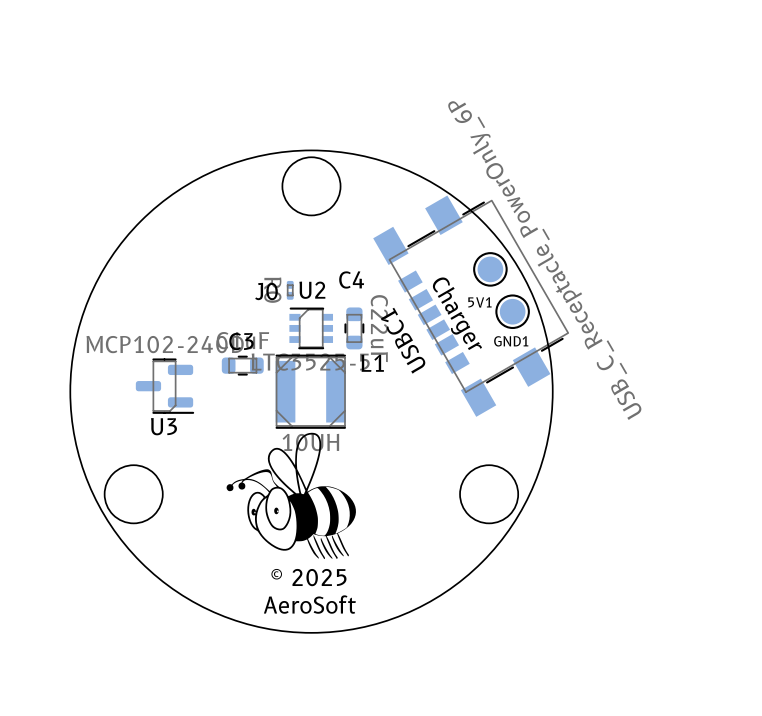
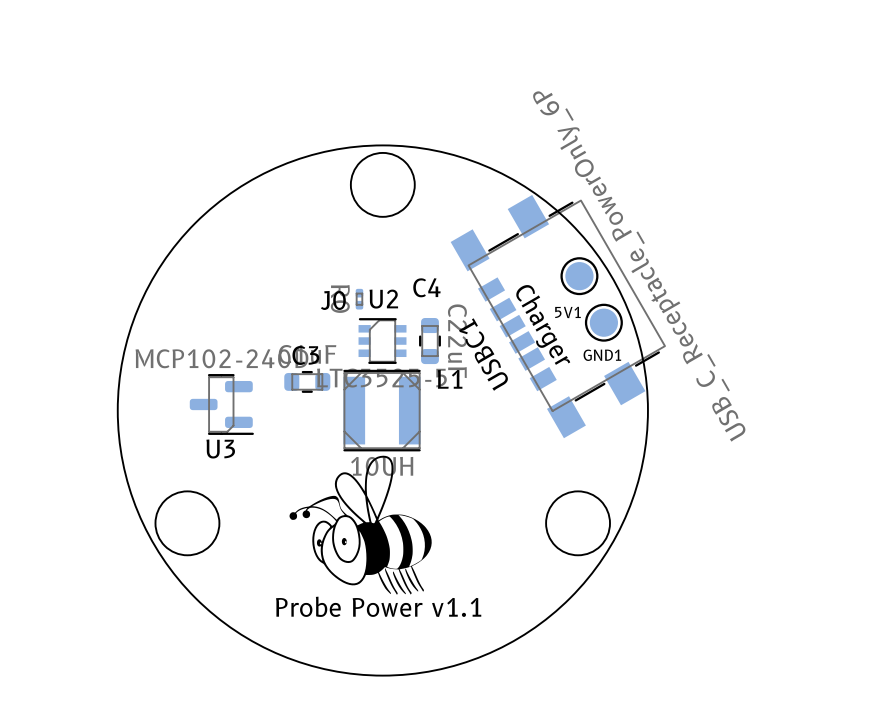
drawing shape: [226, 432, 356, 560] -> [275, 455, 482, 617]
text: © 2025 (308, 577) -> none
text: AeroSoft (309, 604) -> none

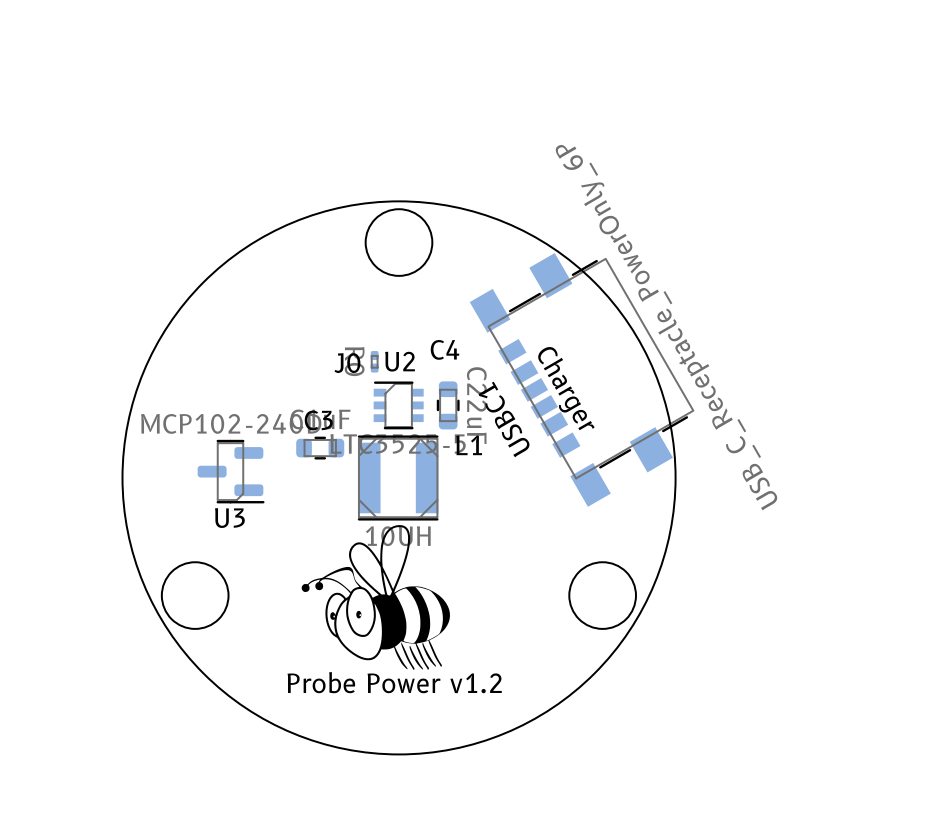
5V1: (579, 276) -> none
GND1: (603, 322) -> none
drawing shape: [275, 455, 482, 617] -> [287, 525, 502, 694]

